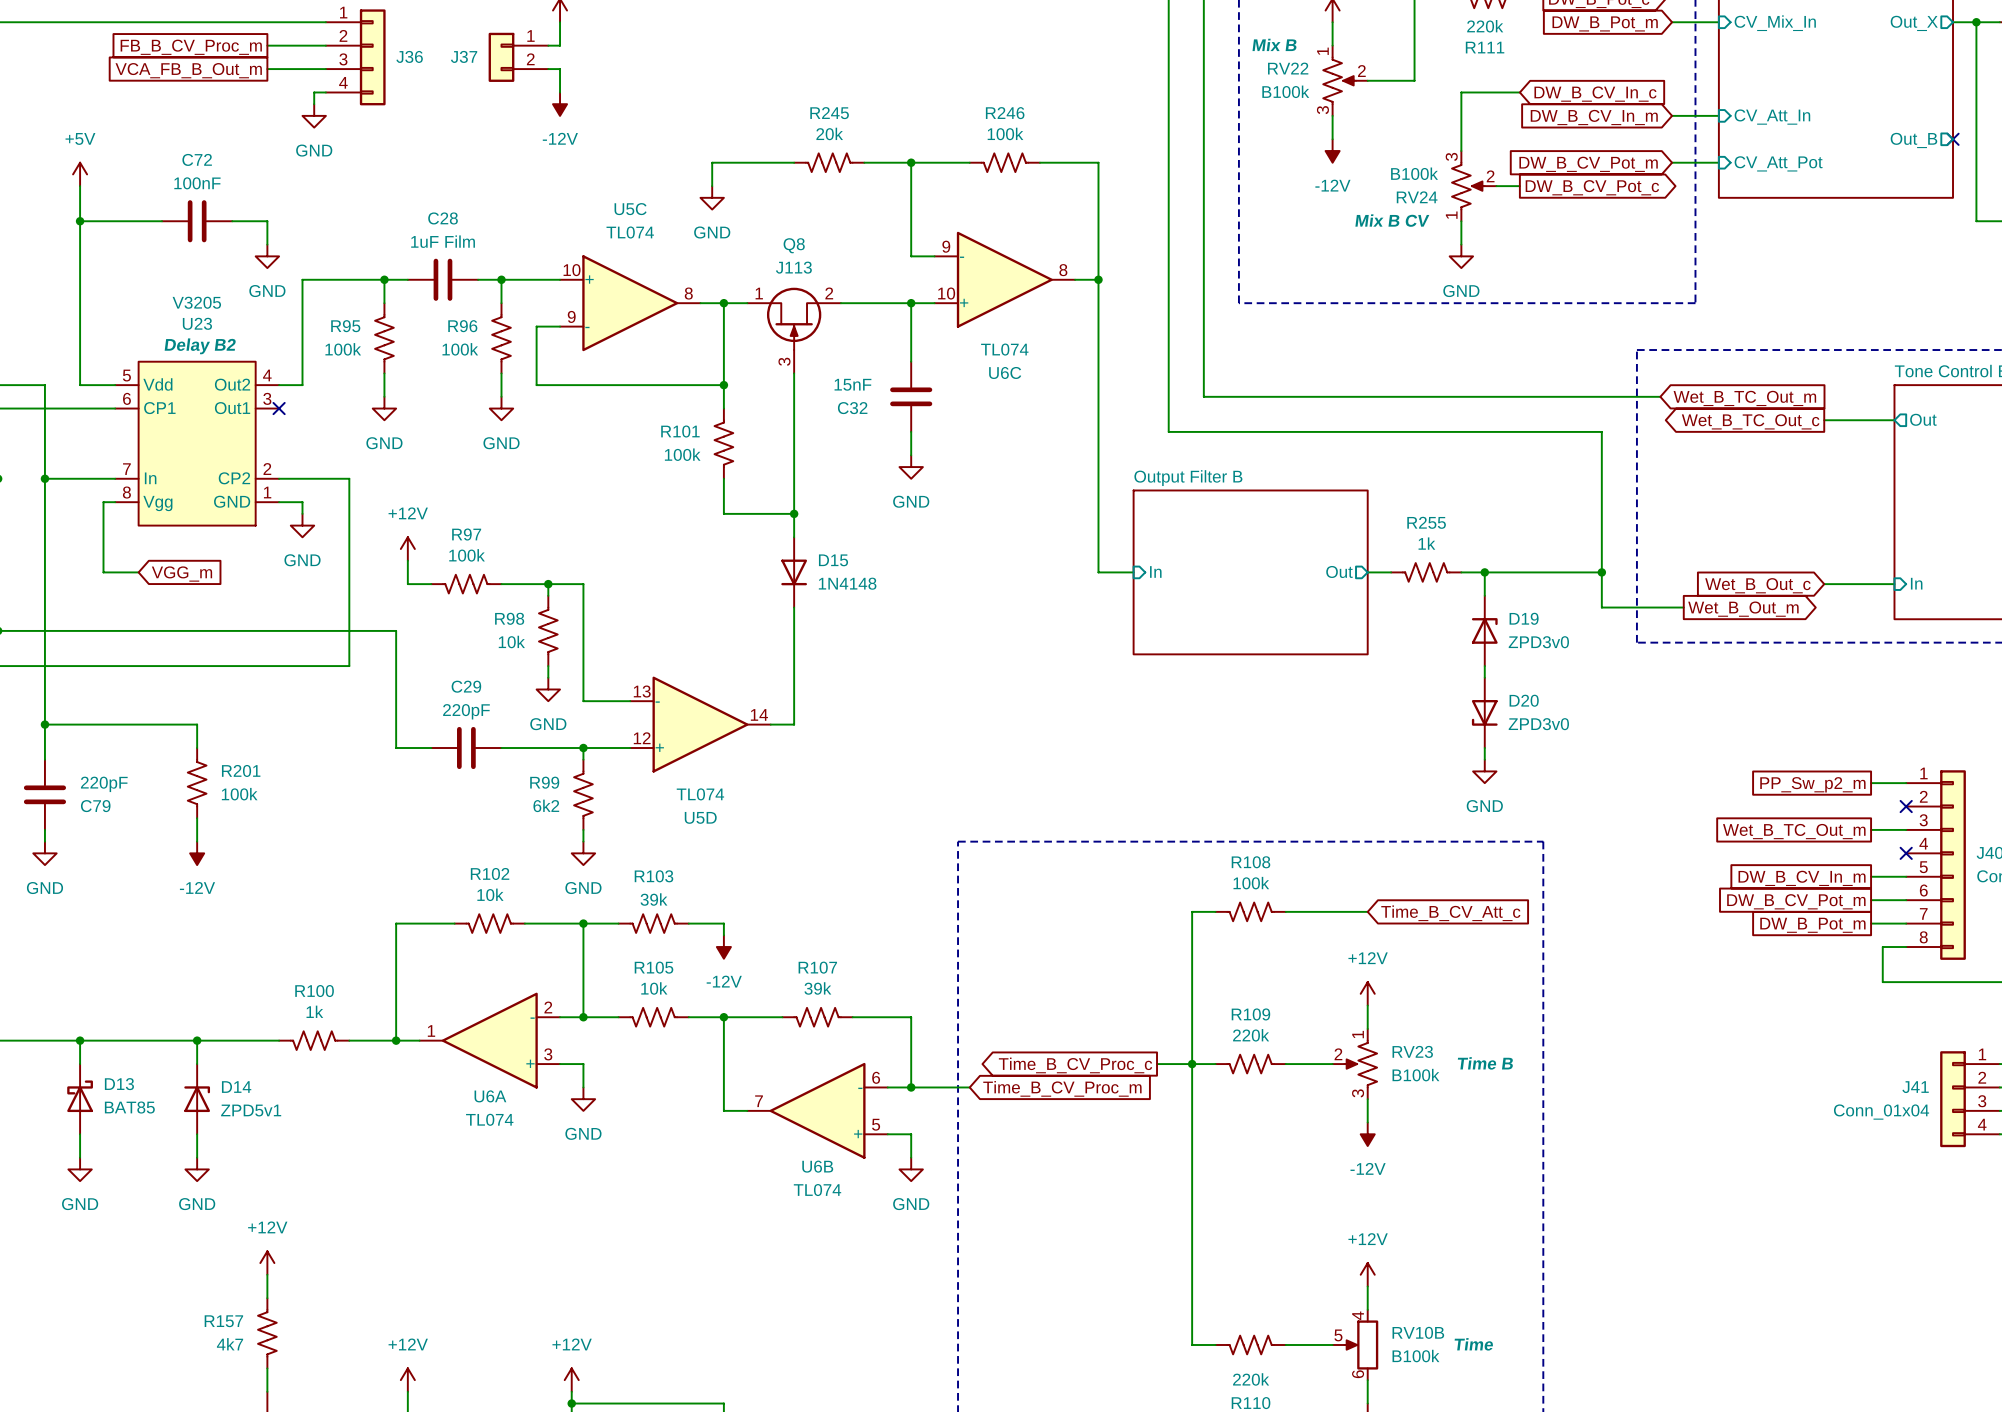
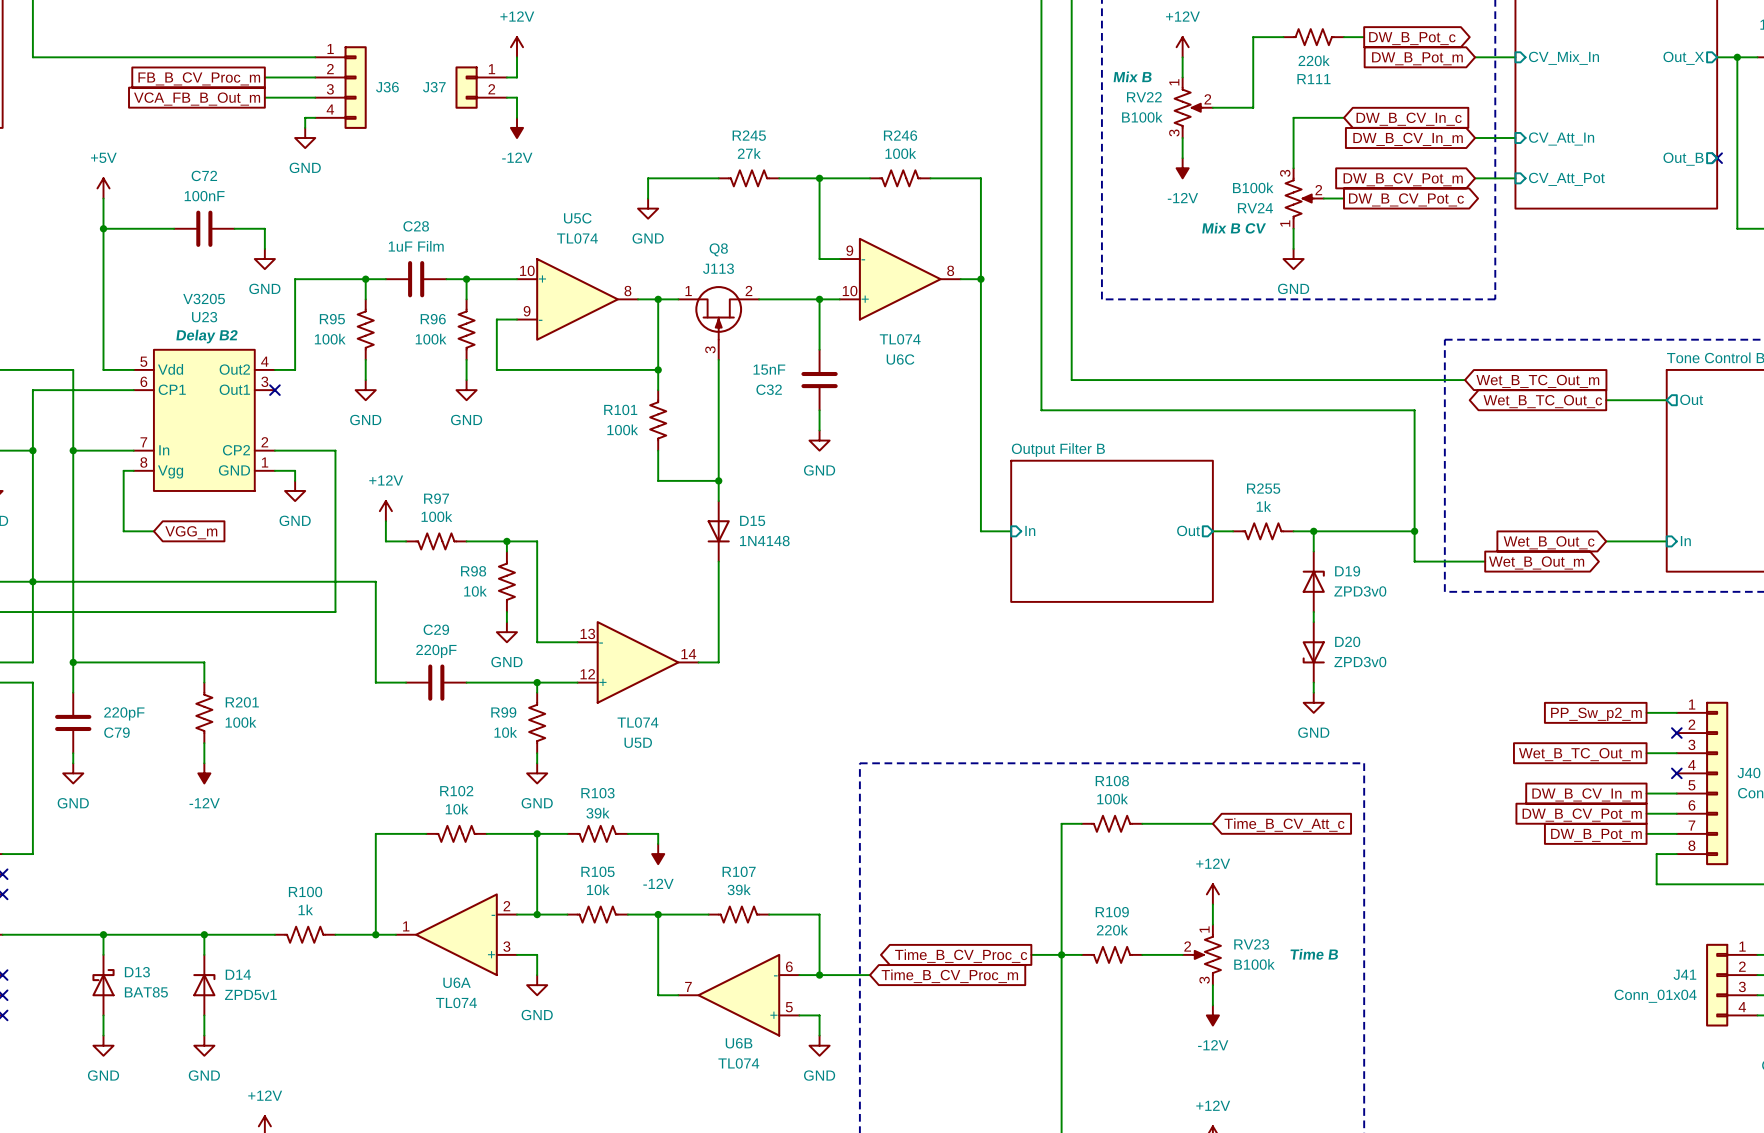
R245 value: 20k (829, 133) -> 27k (749, 153)
R99 value: 6k2 (546, 805) -> 10k (505, 732)

